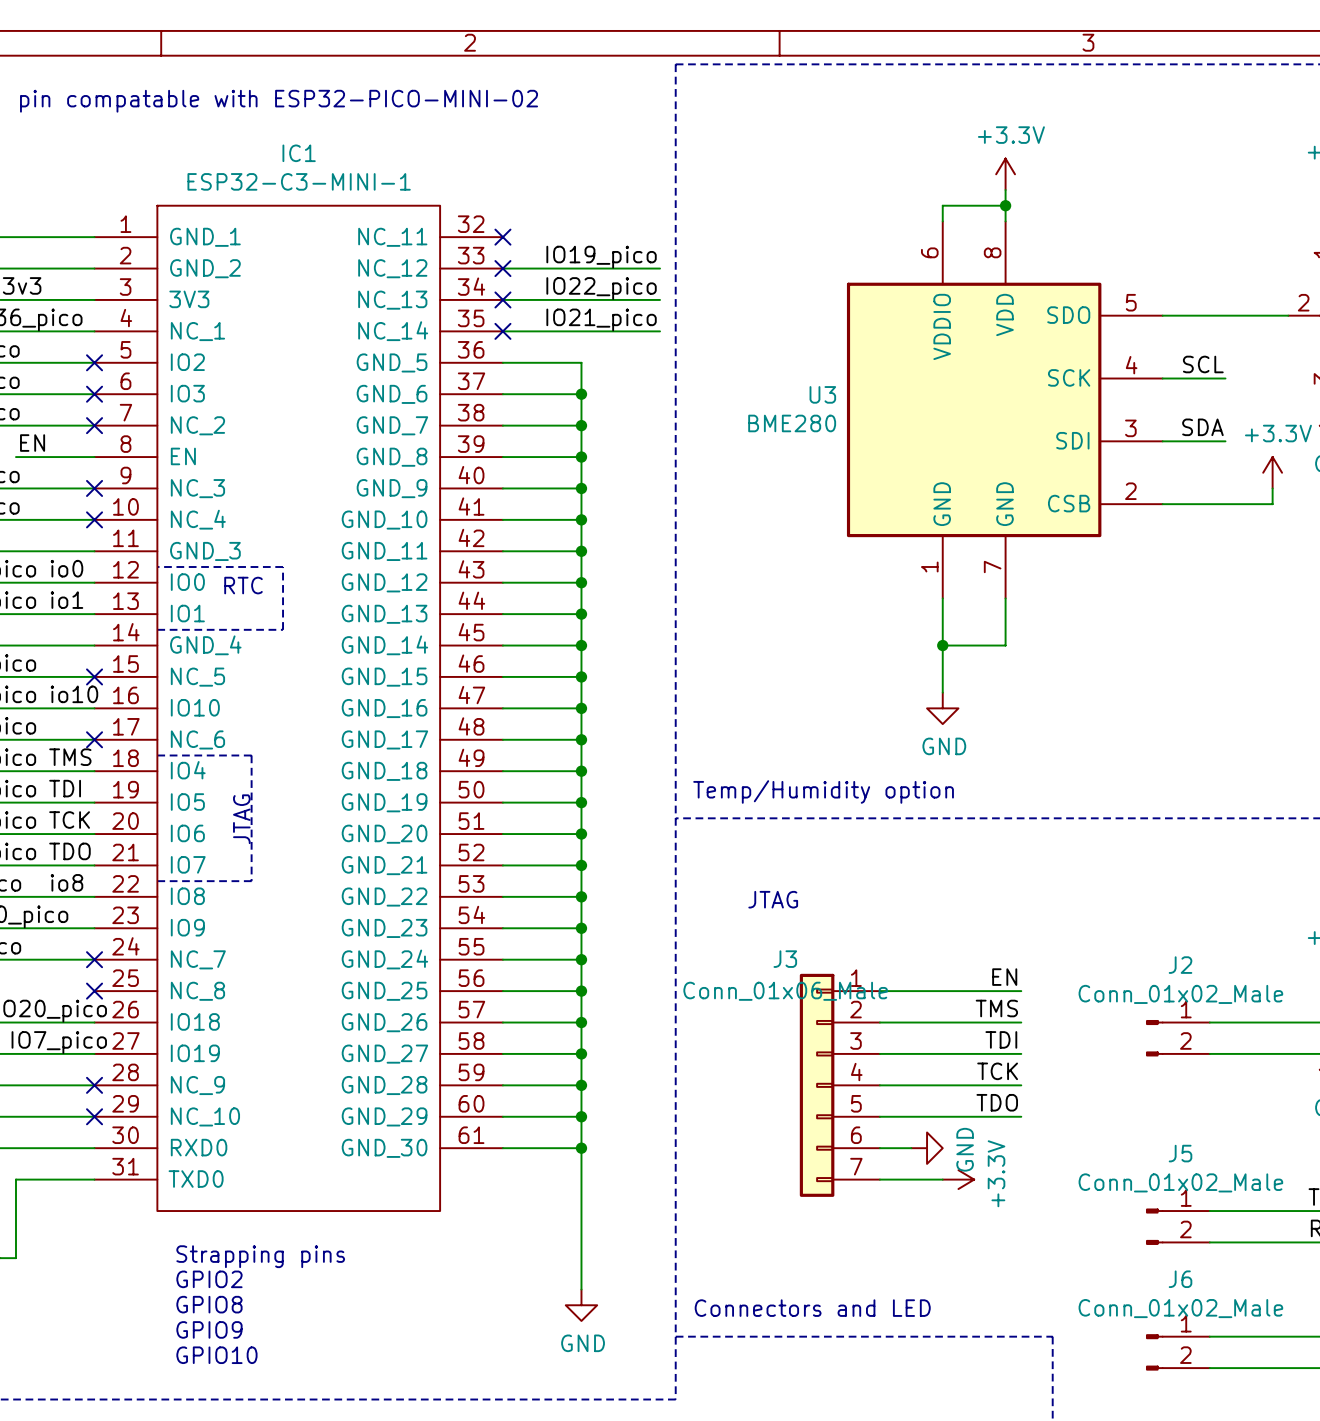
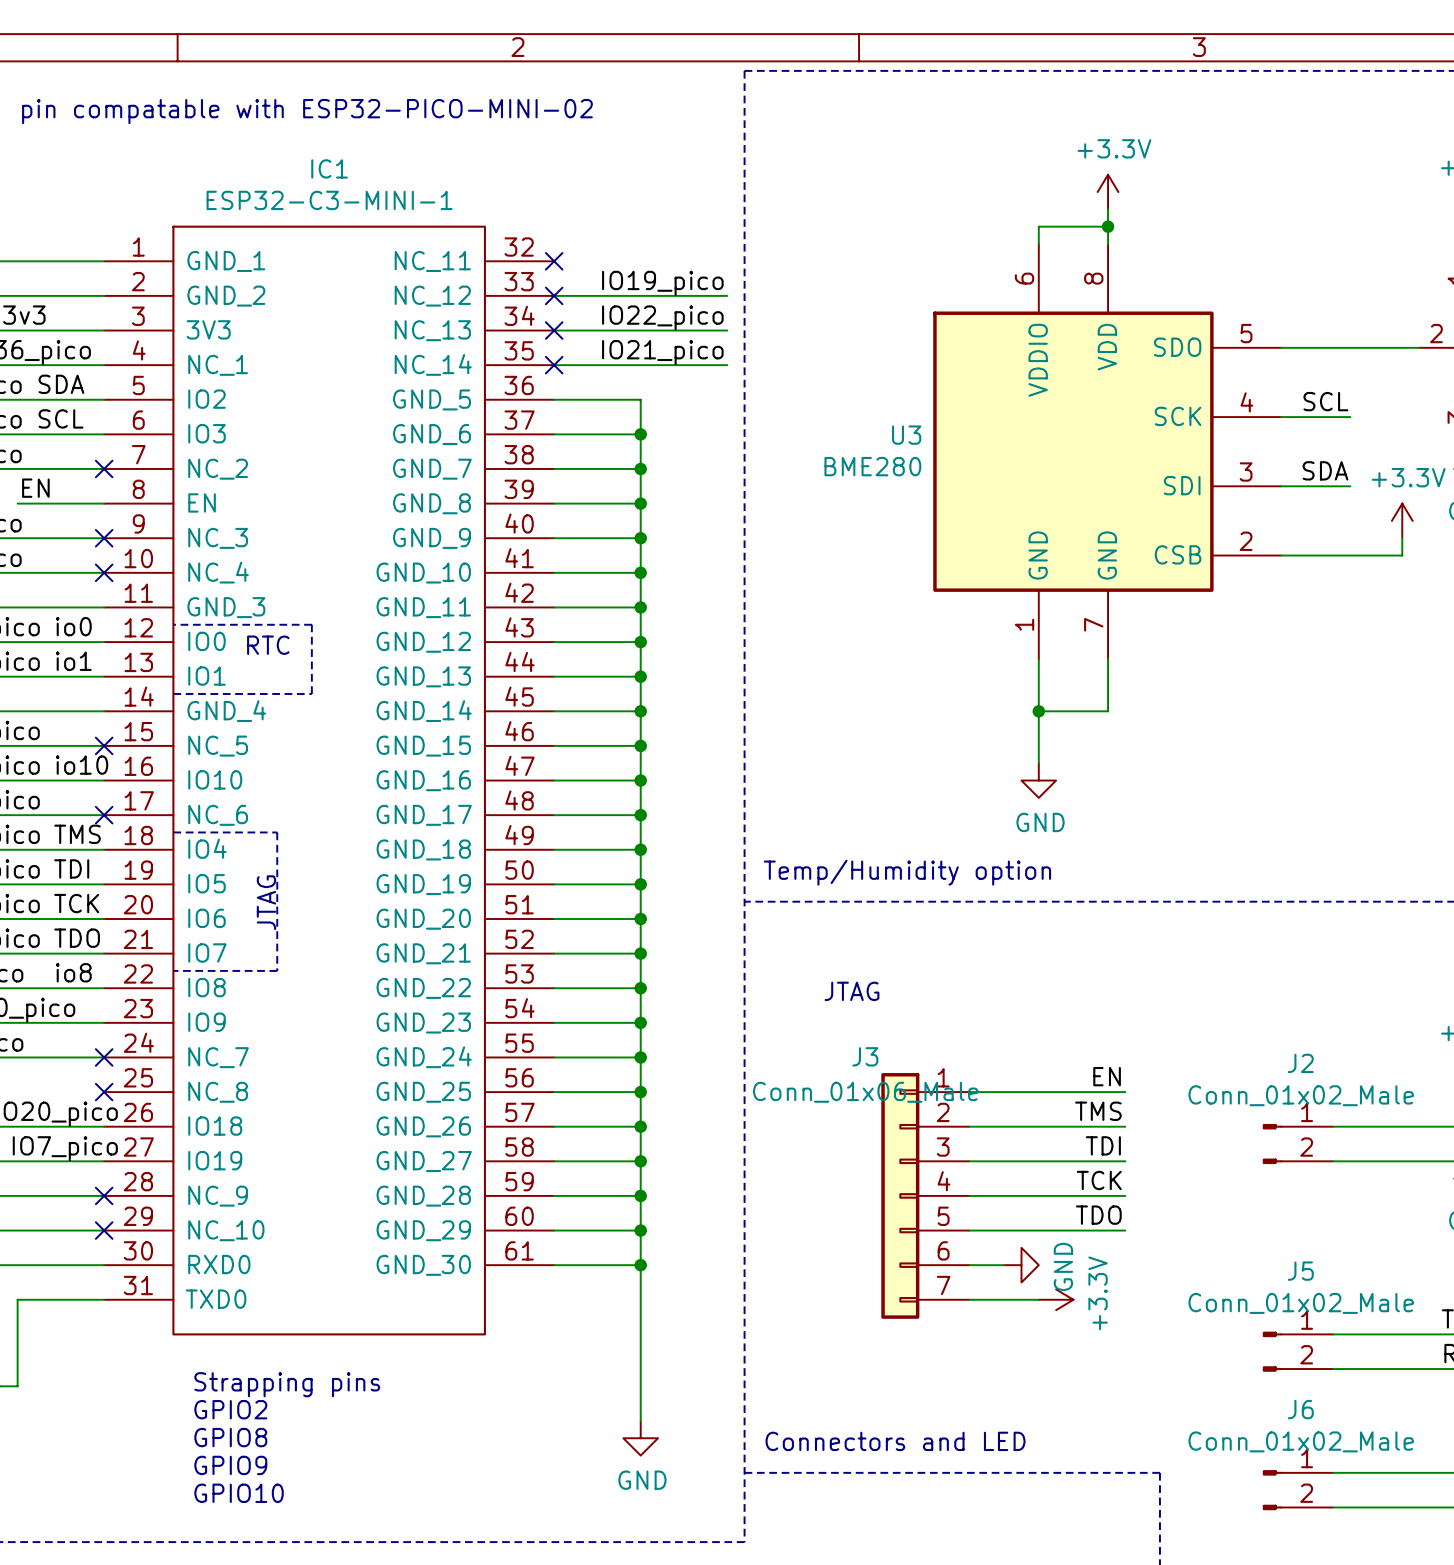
label: none -> SDA (61, 384)
no-connect mark: (94, 362) -> none
label: none -> SCL (61, 418)
no-connect mark: (94, 394) -> none

